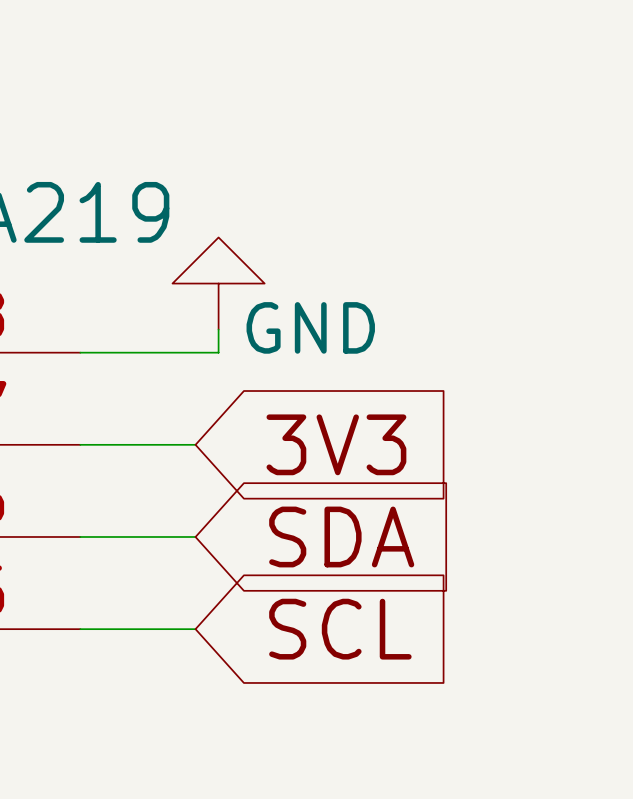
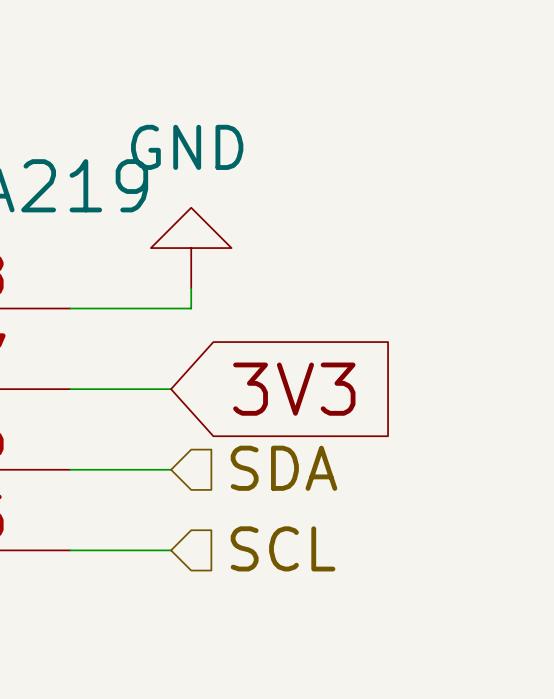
power symbol text position: GND (310, 327) -> GND (187, 147)
hierarchical label: none -> SDA (283, 468)
global label: SDA (341, 536) -> none
hierarchical label: none -> SCL (283, 548)
global label: SCL (340, 629) -> none

